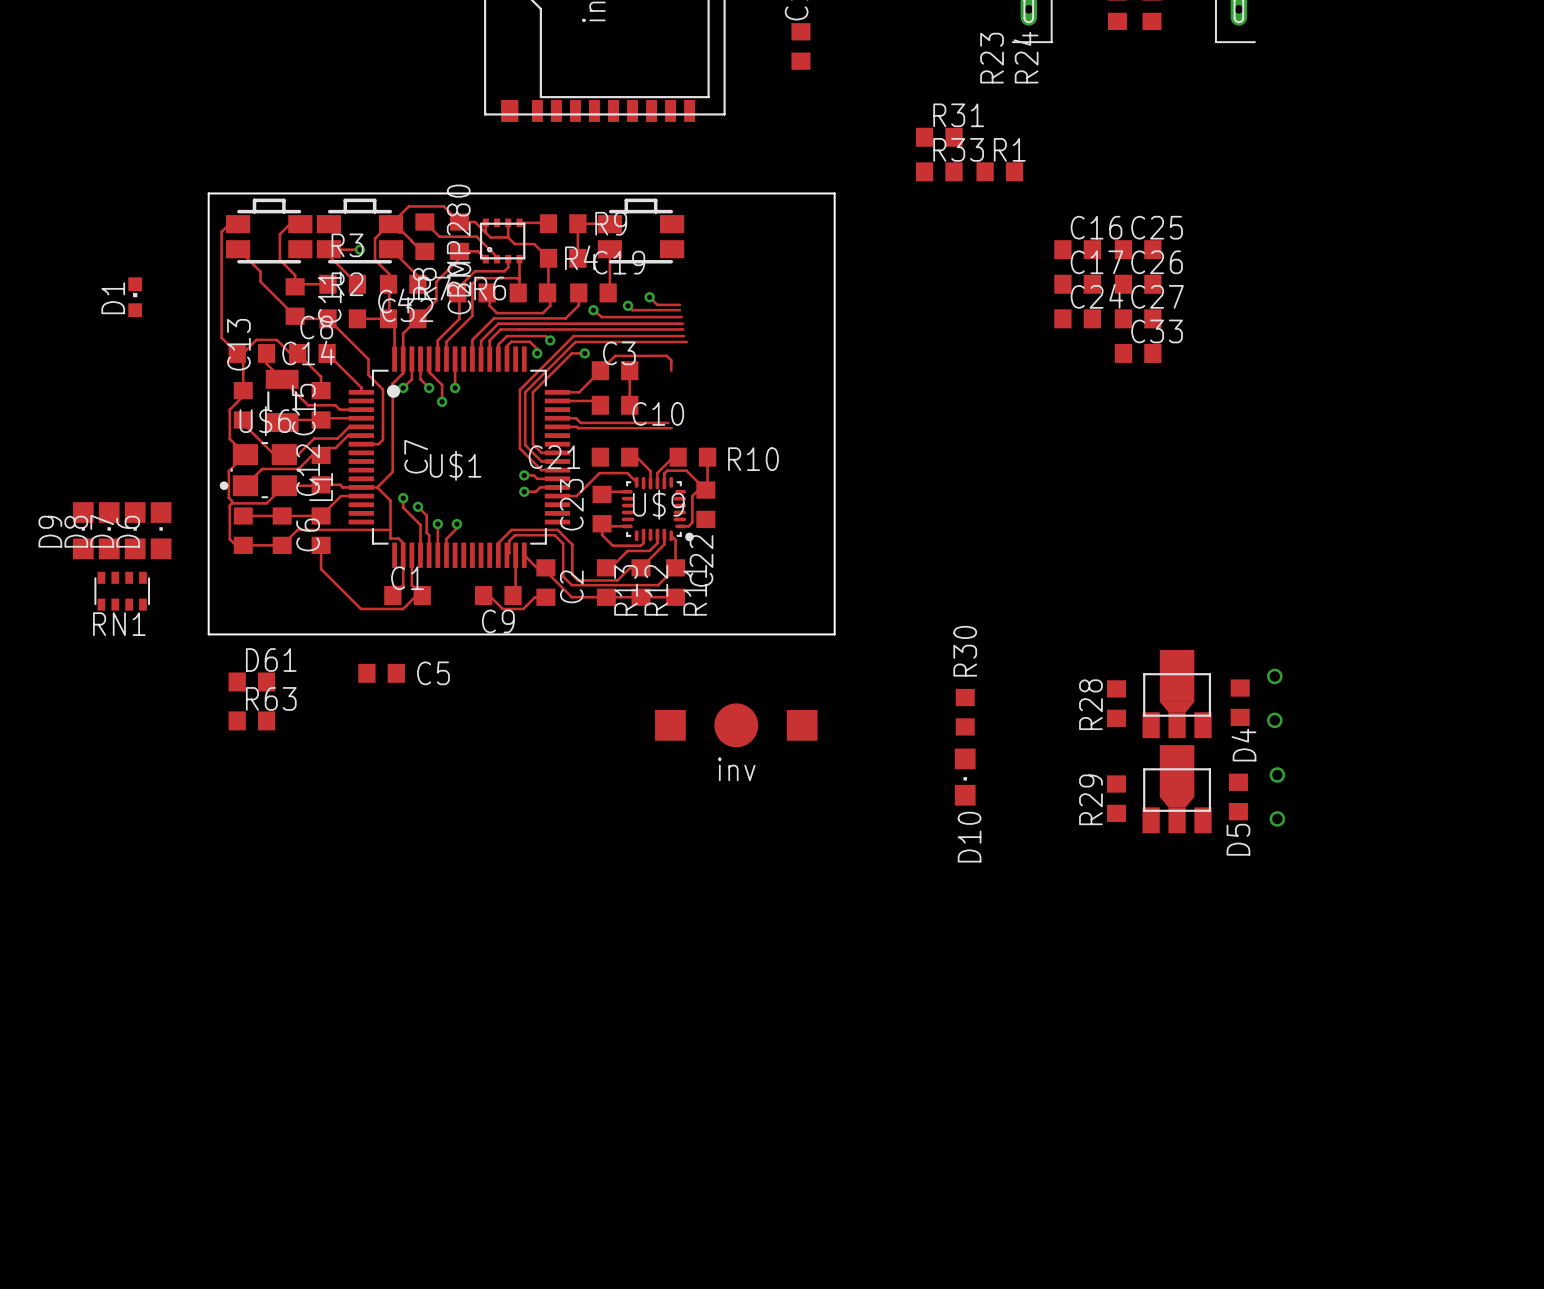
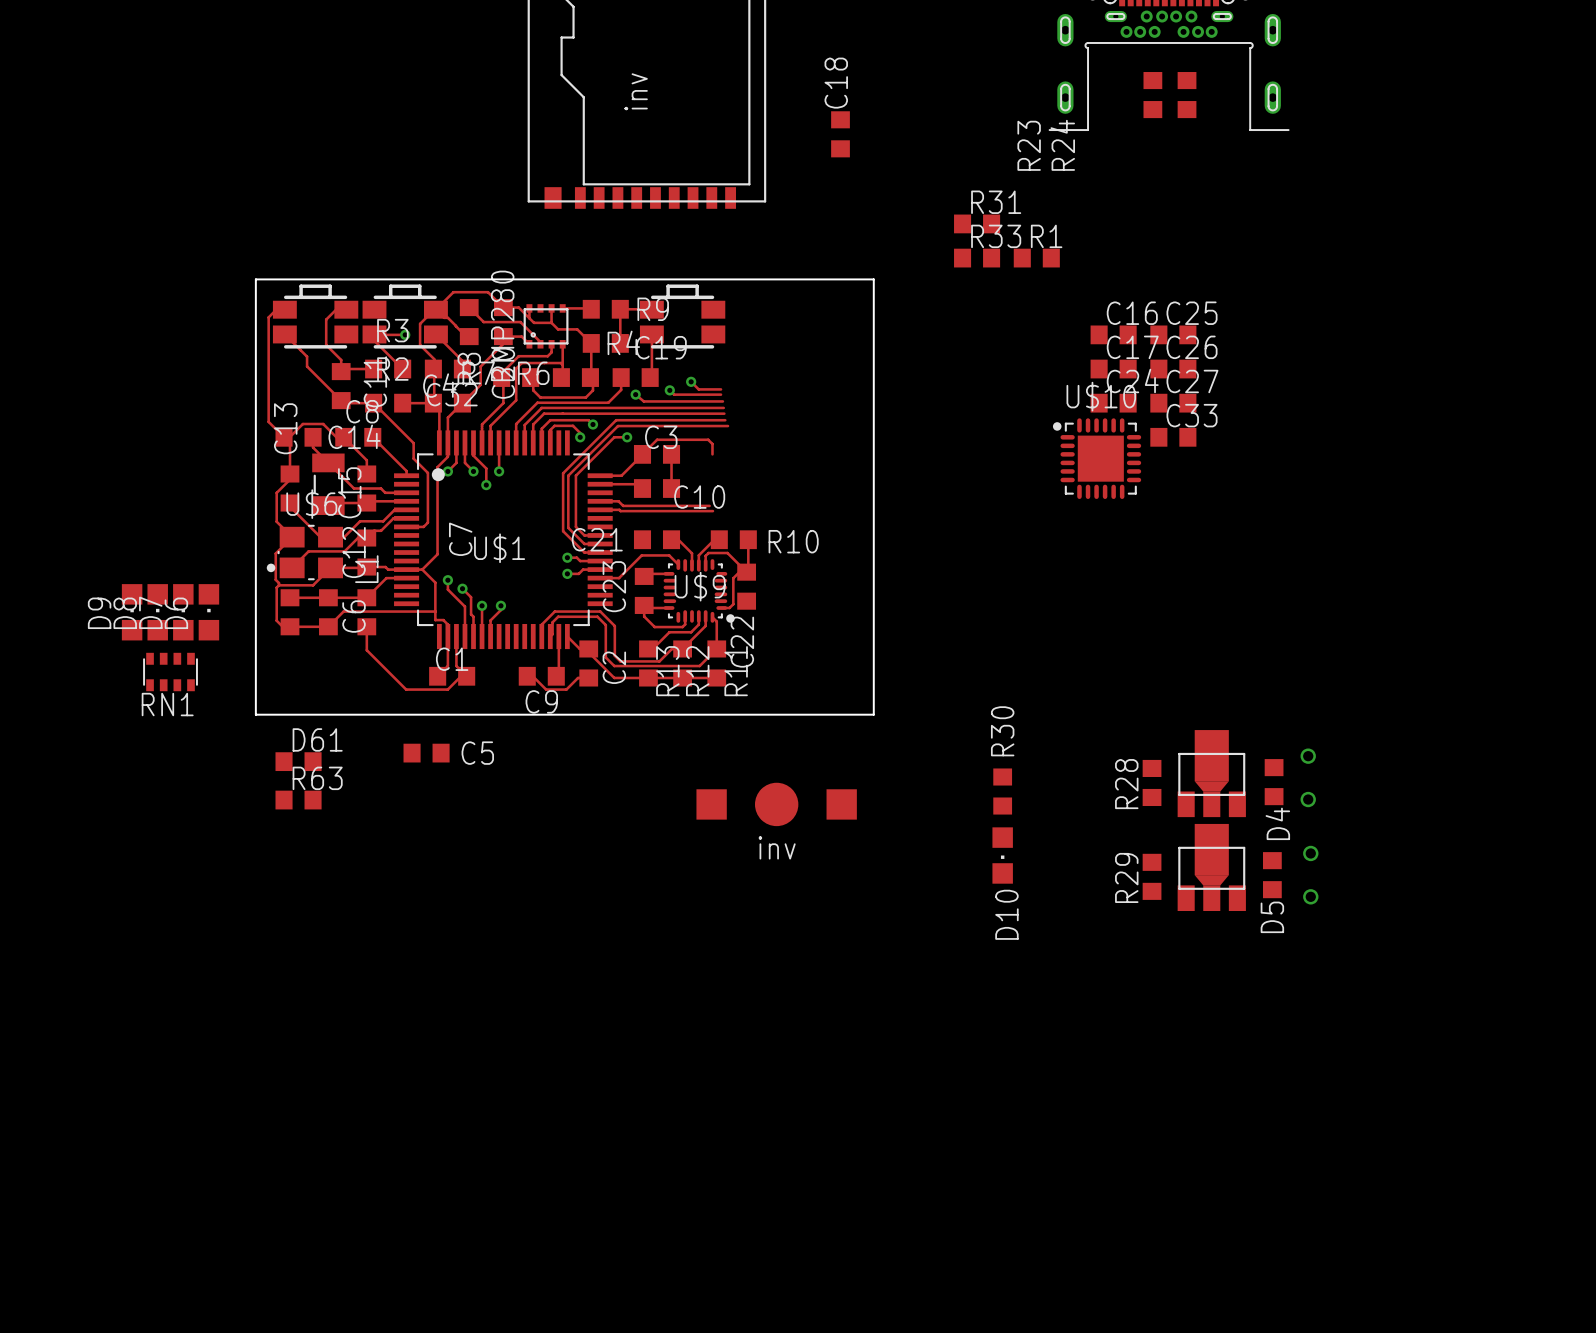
D1: (135, 297) -> none
U$10: none -> (1097, 458)

